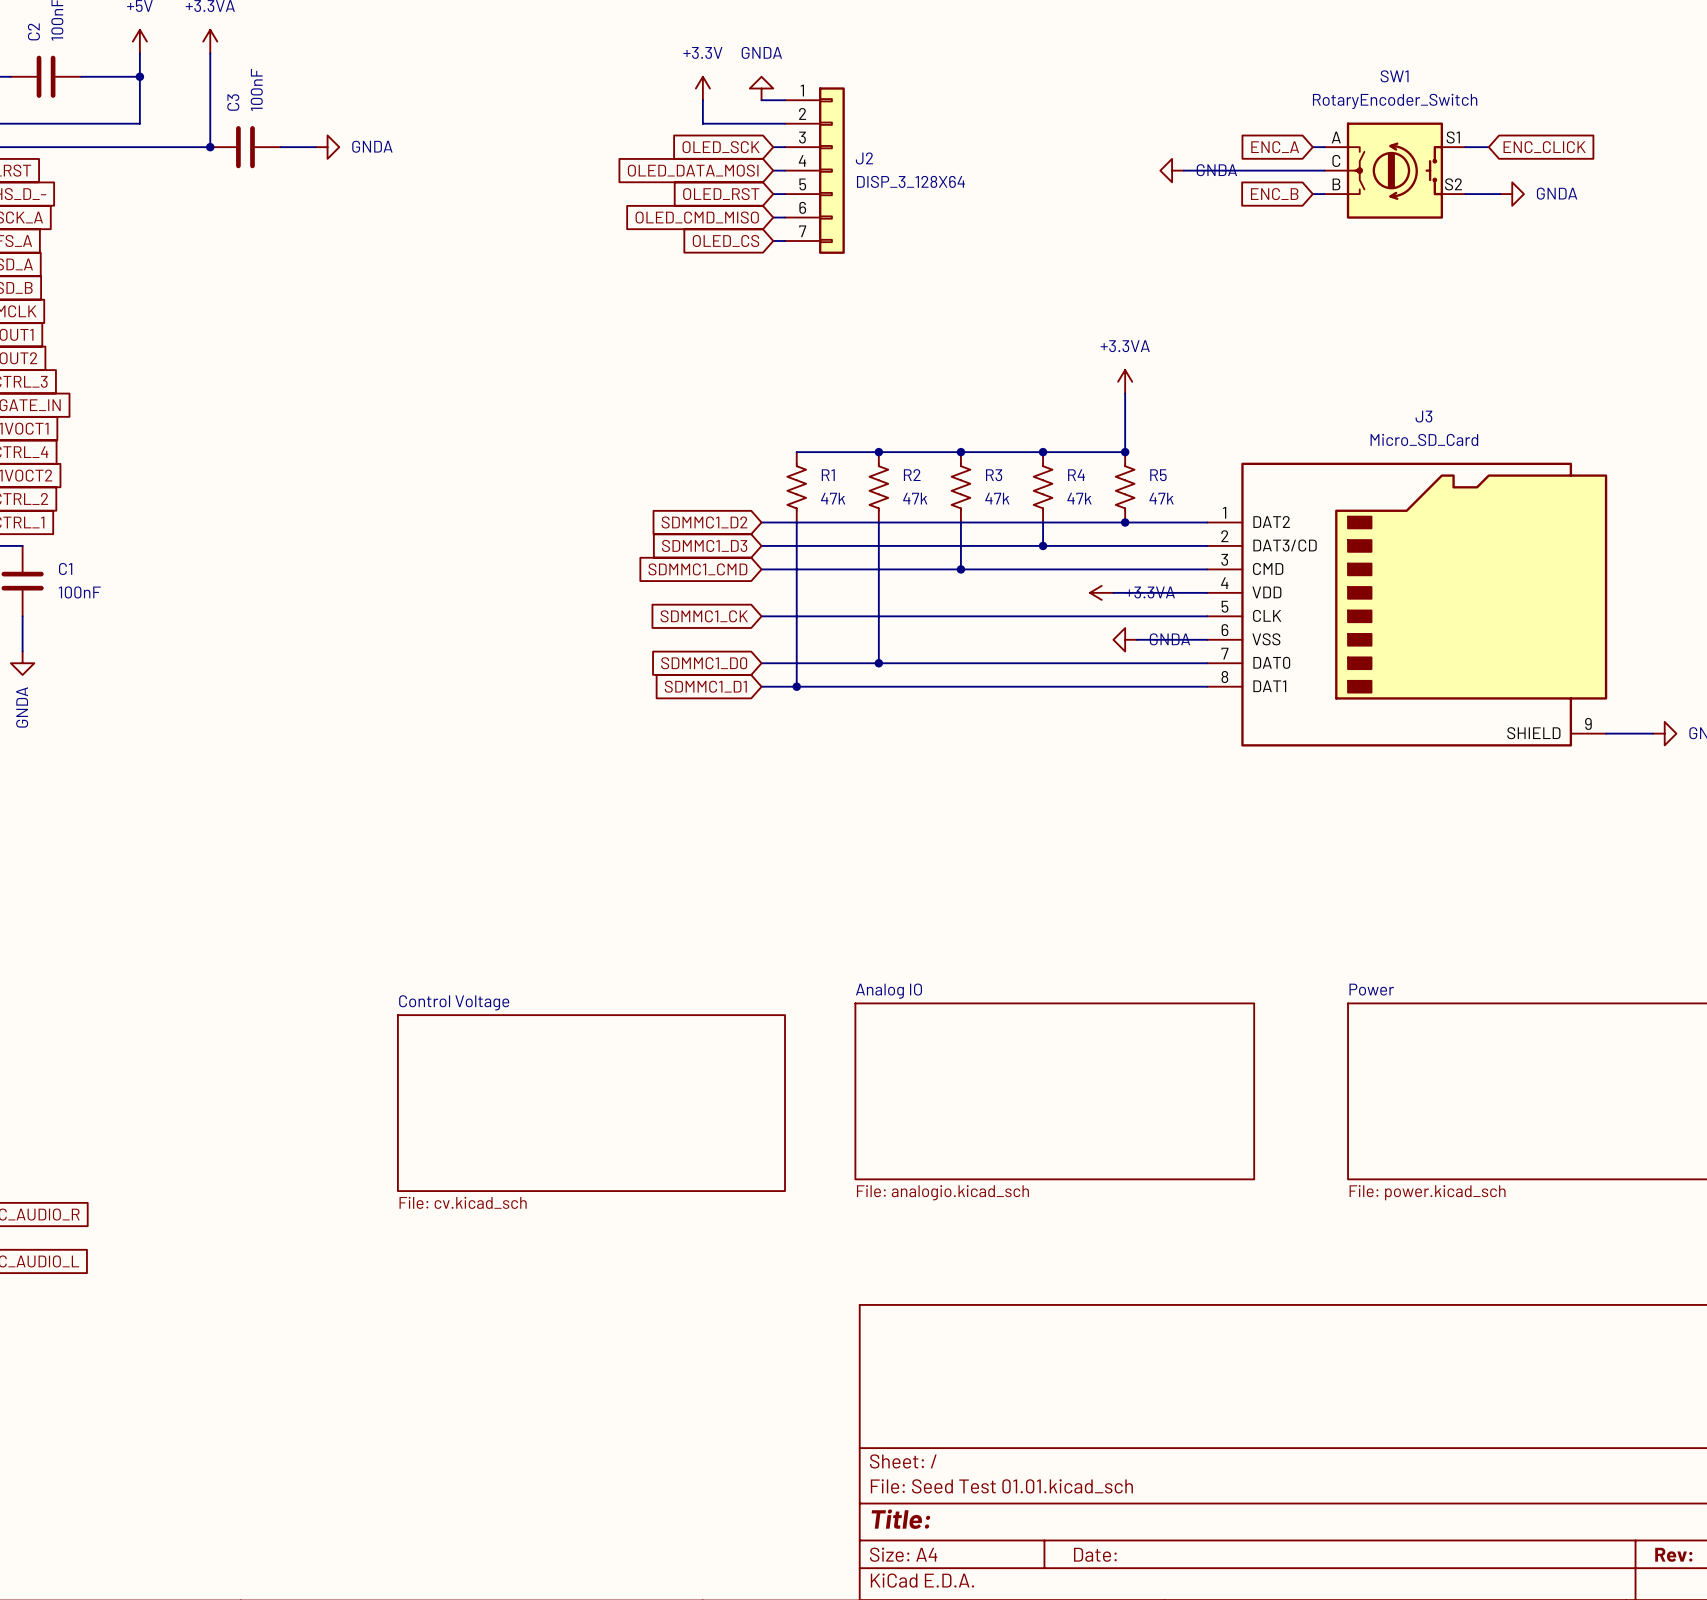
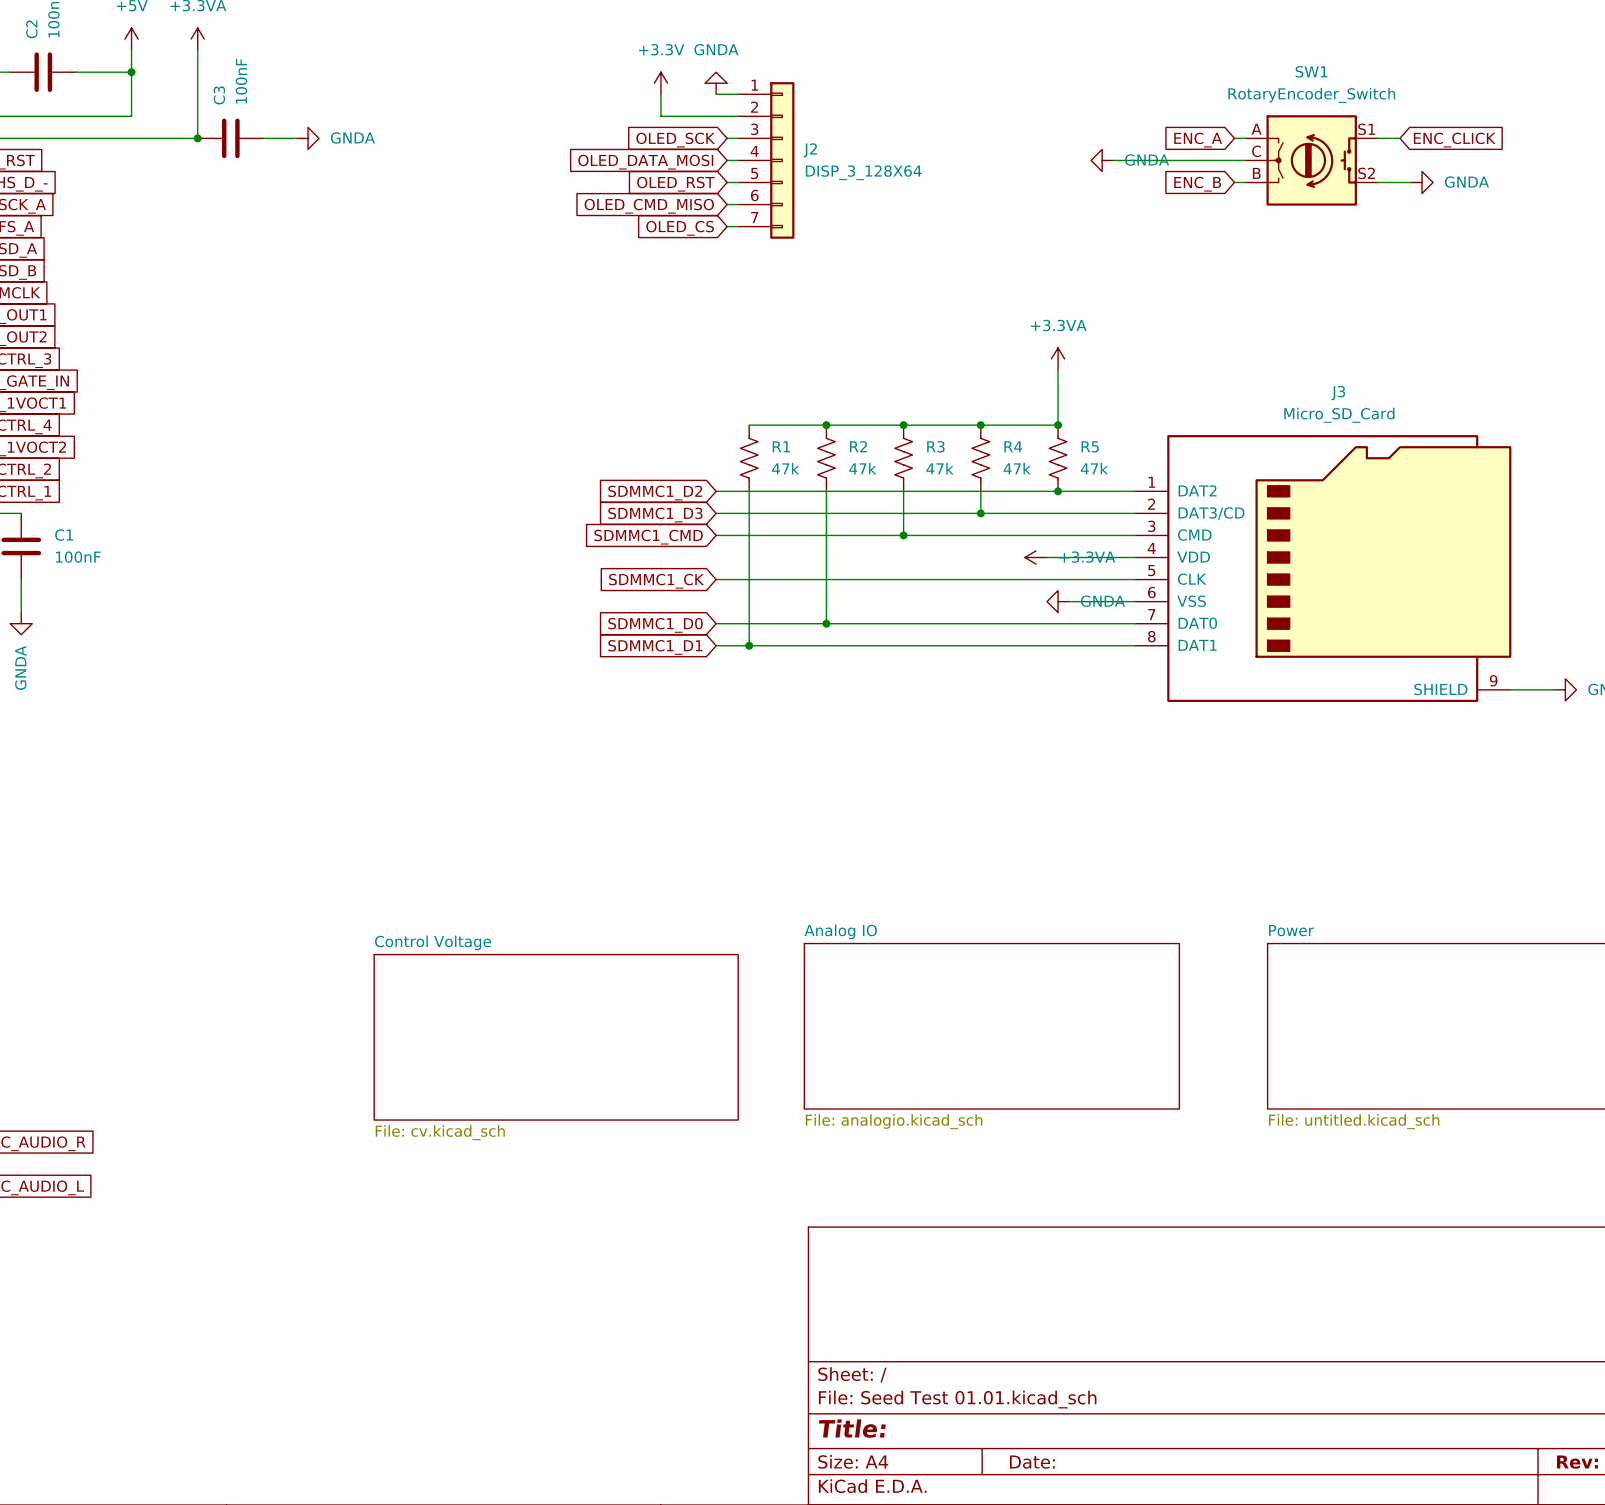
sheet Power value: File: power.kicad_sch (1427, 1192) -> File: untitled.kicad_sch (1354, 1121)

